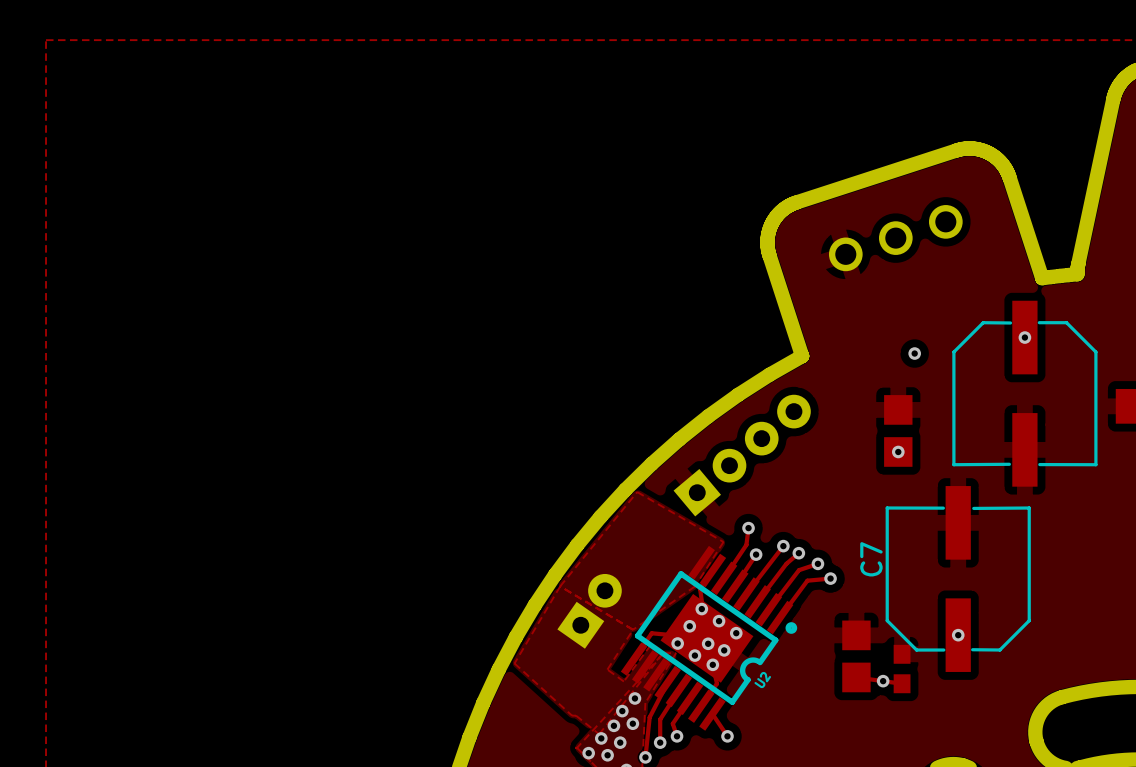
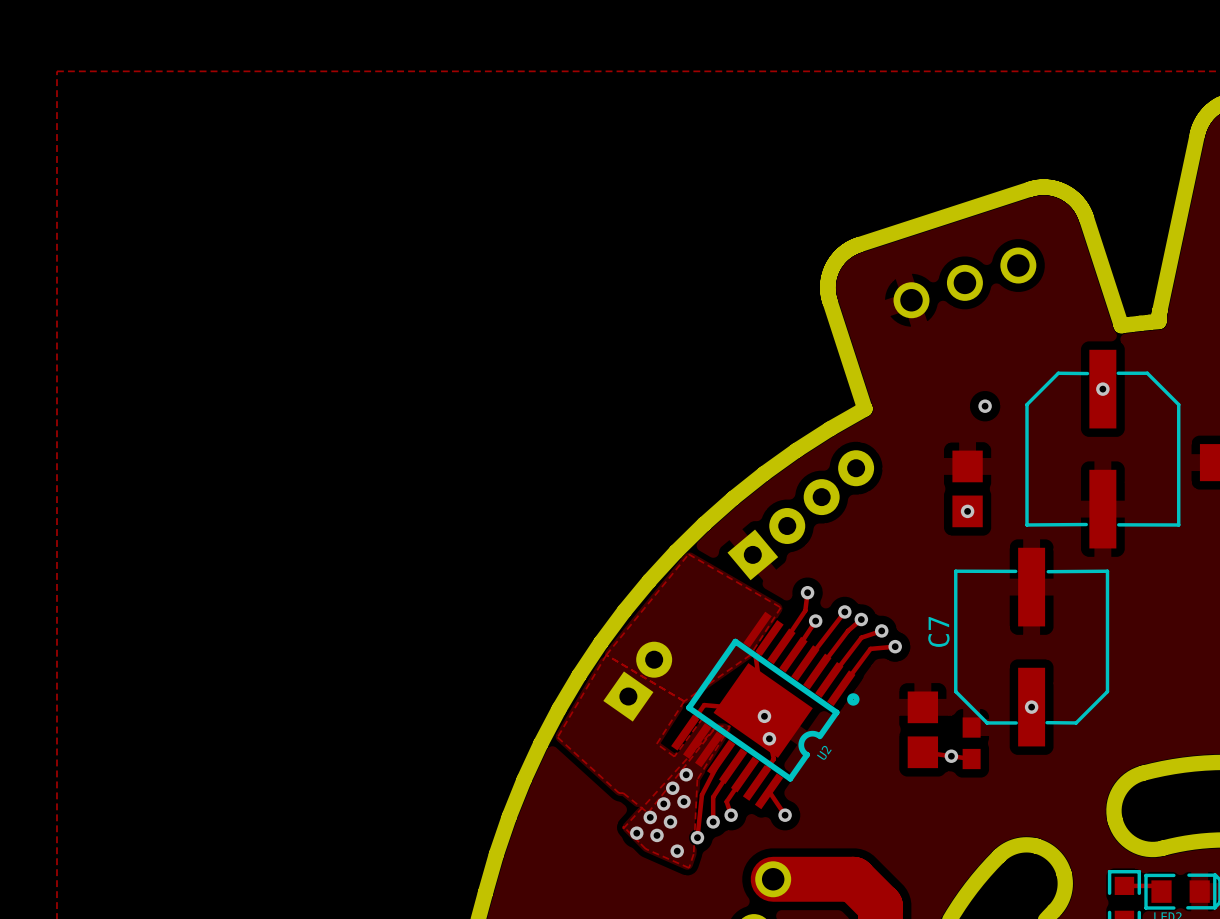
via: (701, 609) -> none
via: (719, 621) -> none
via: (689, 626) -> none
via: (736, 633) -> none
via: (677, 643) -> none
via: (724, 650) -> none
via: (694, 655) -> none

